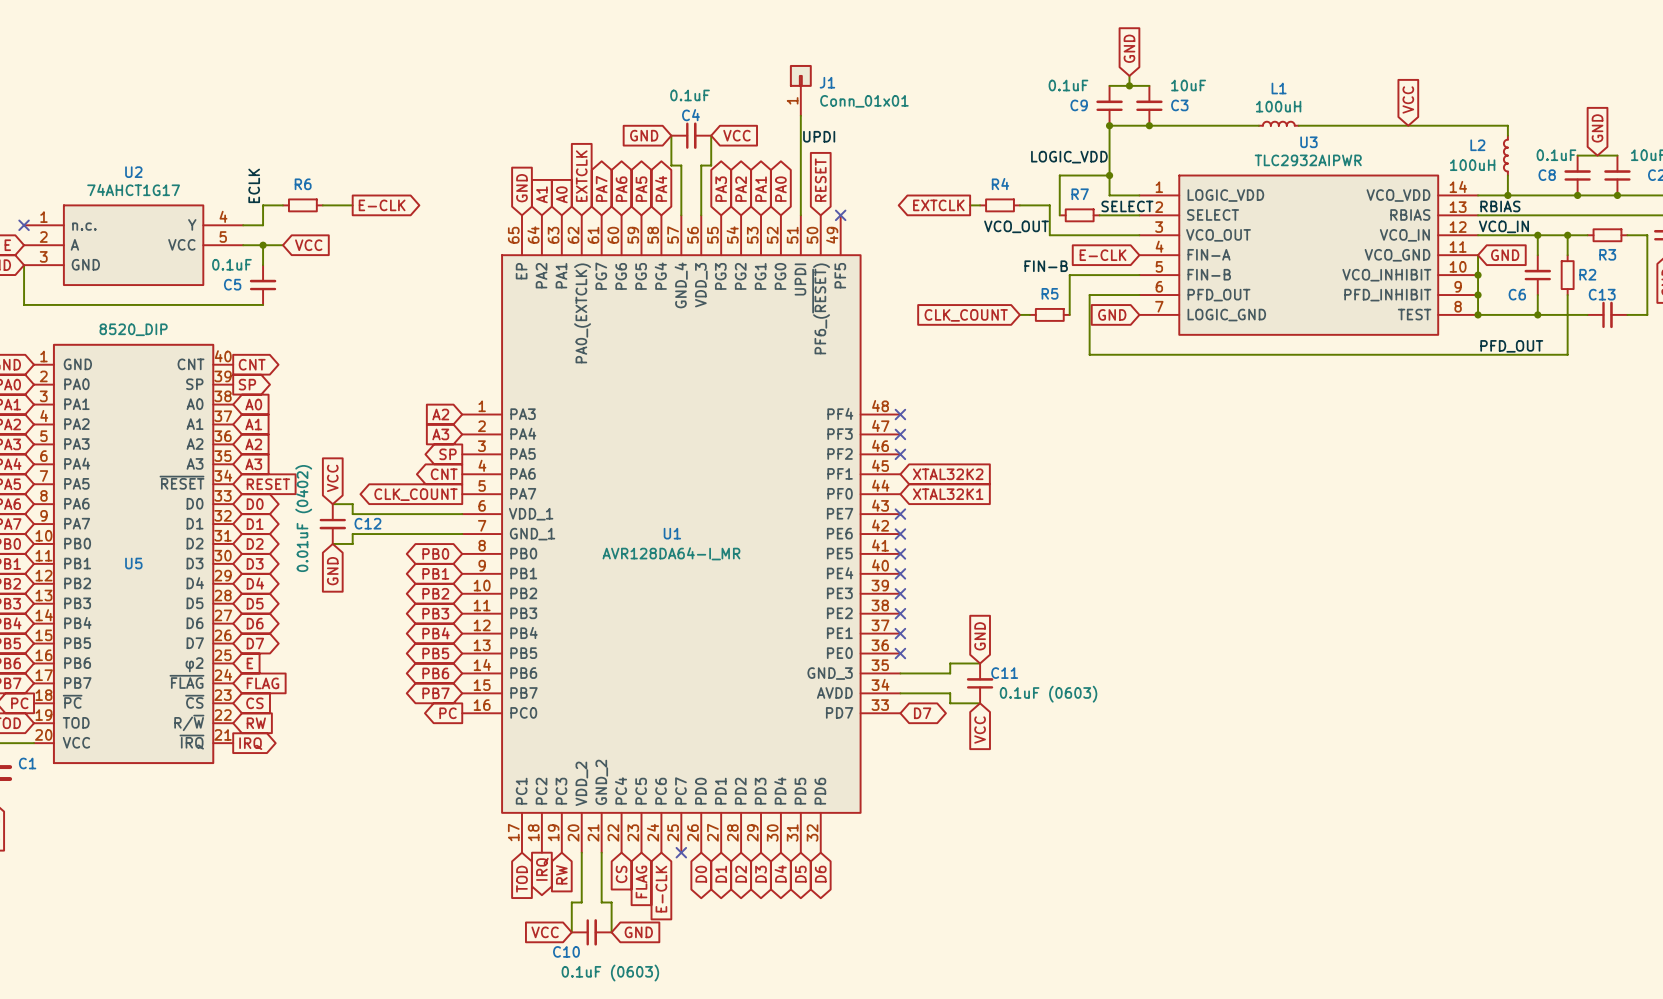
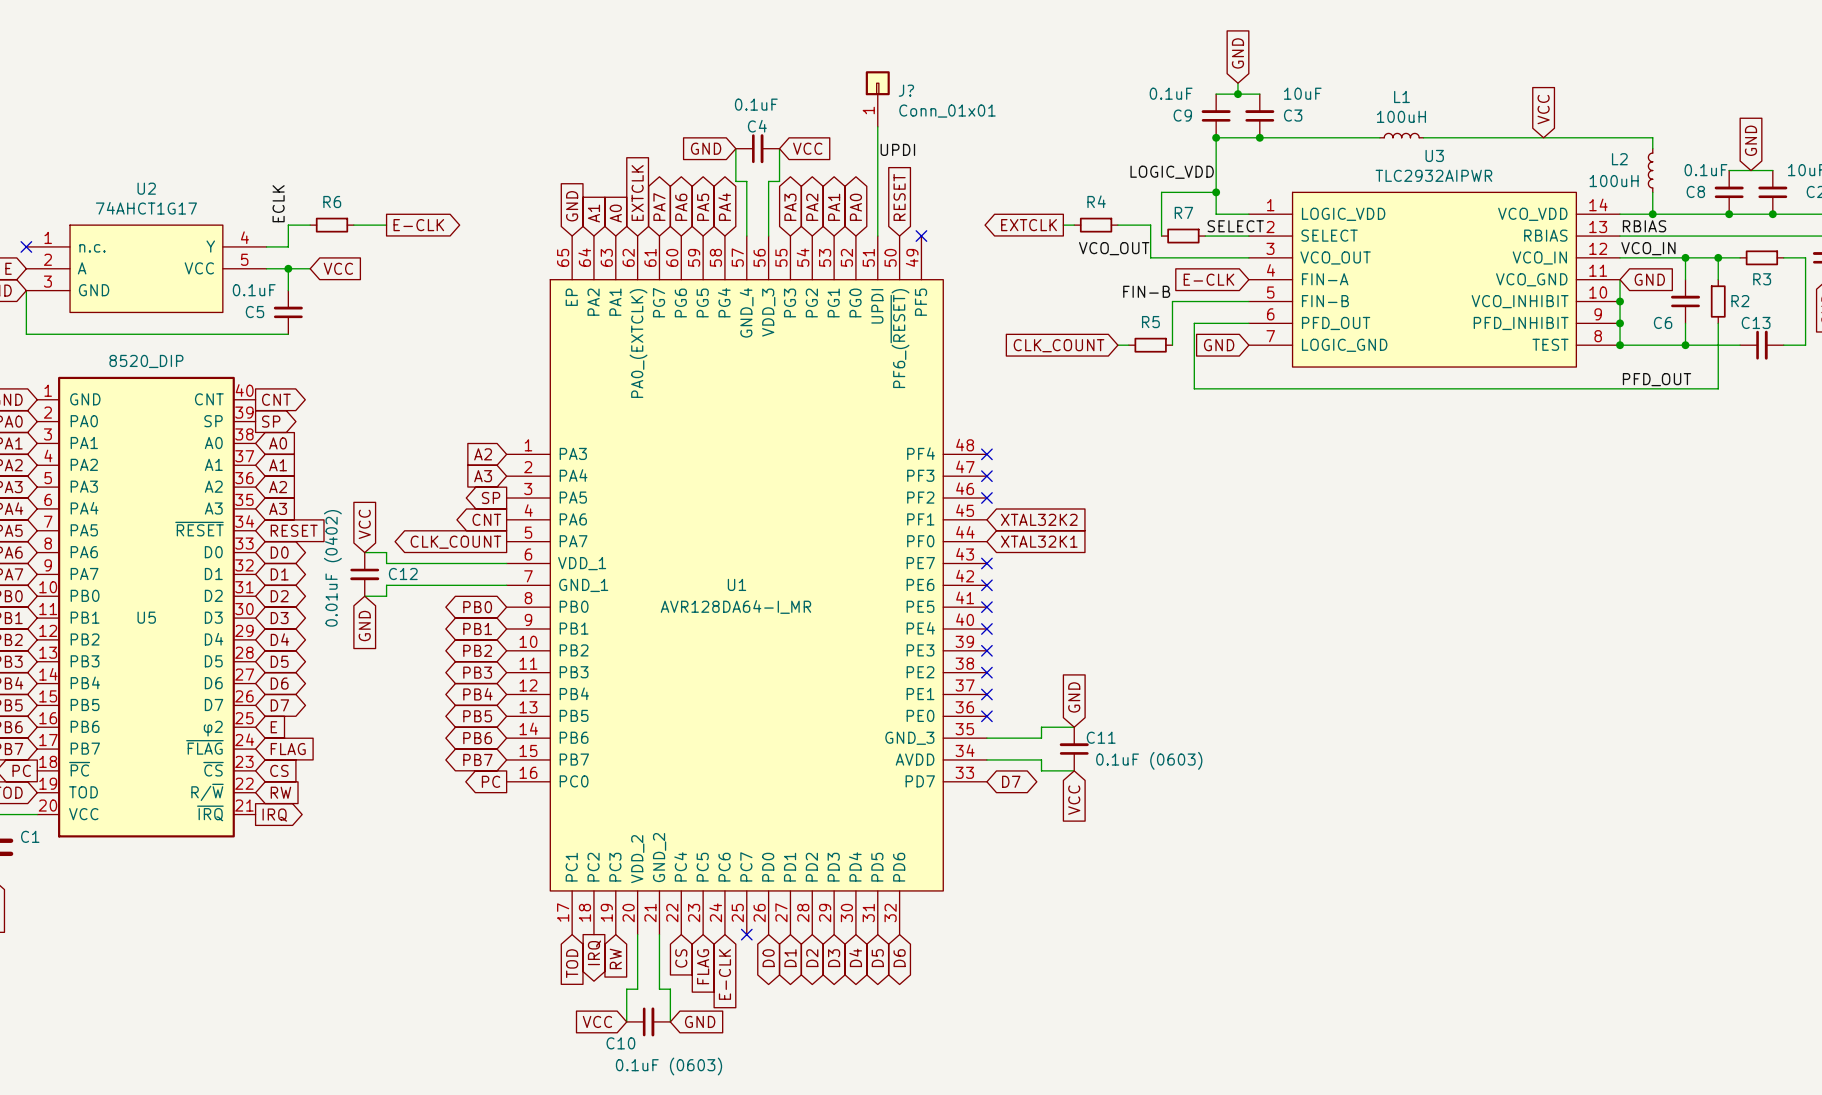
J1 name: J1 (827, 82) -> J? (906, 90)

